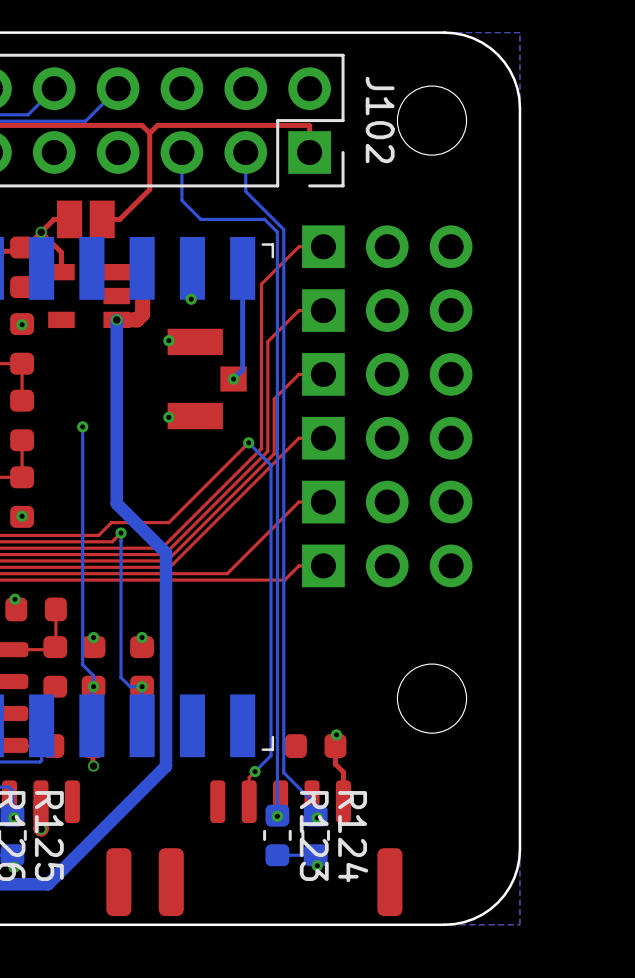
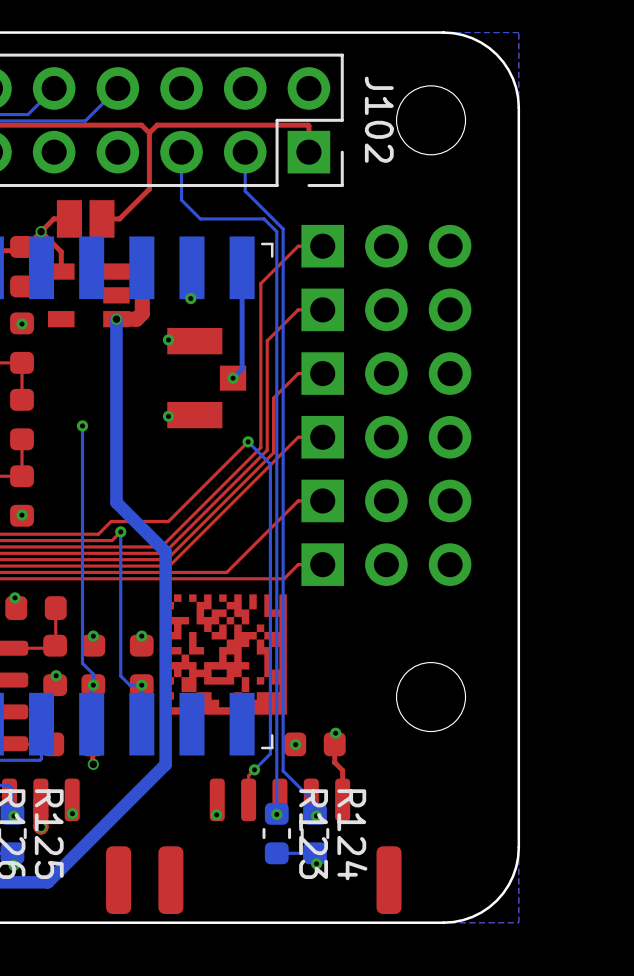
part: none -> (226, 654)
via: none -> (56, 675)
via: none -> (295, 744)
via: none -> (72, 813)
via: none -> (216, 814)

